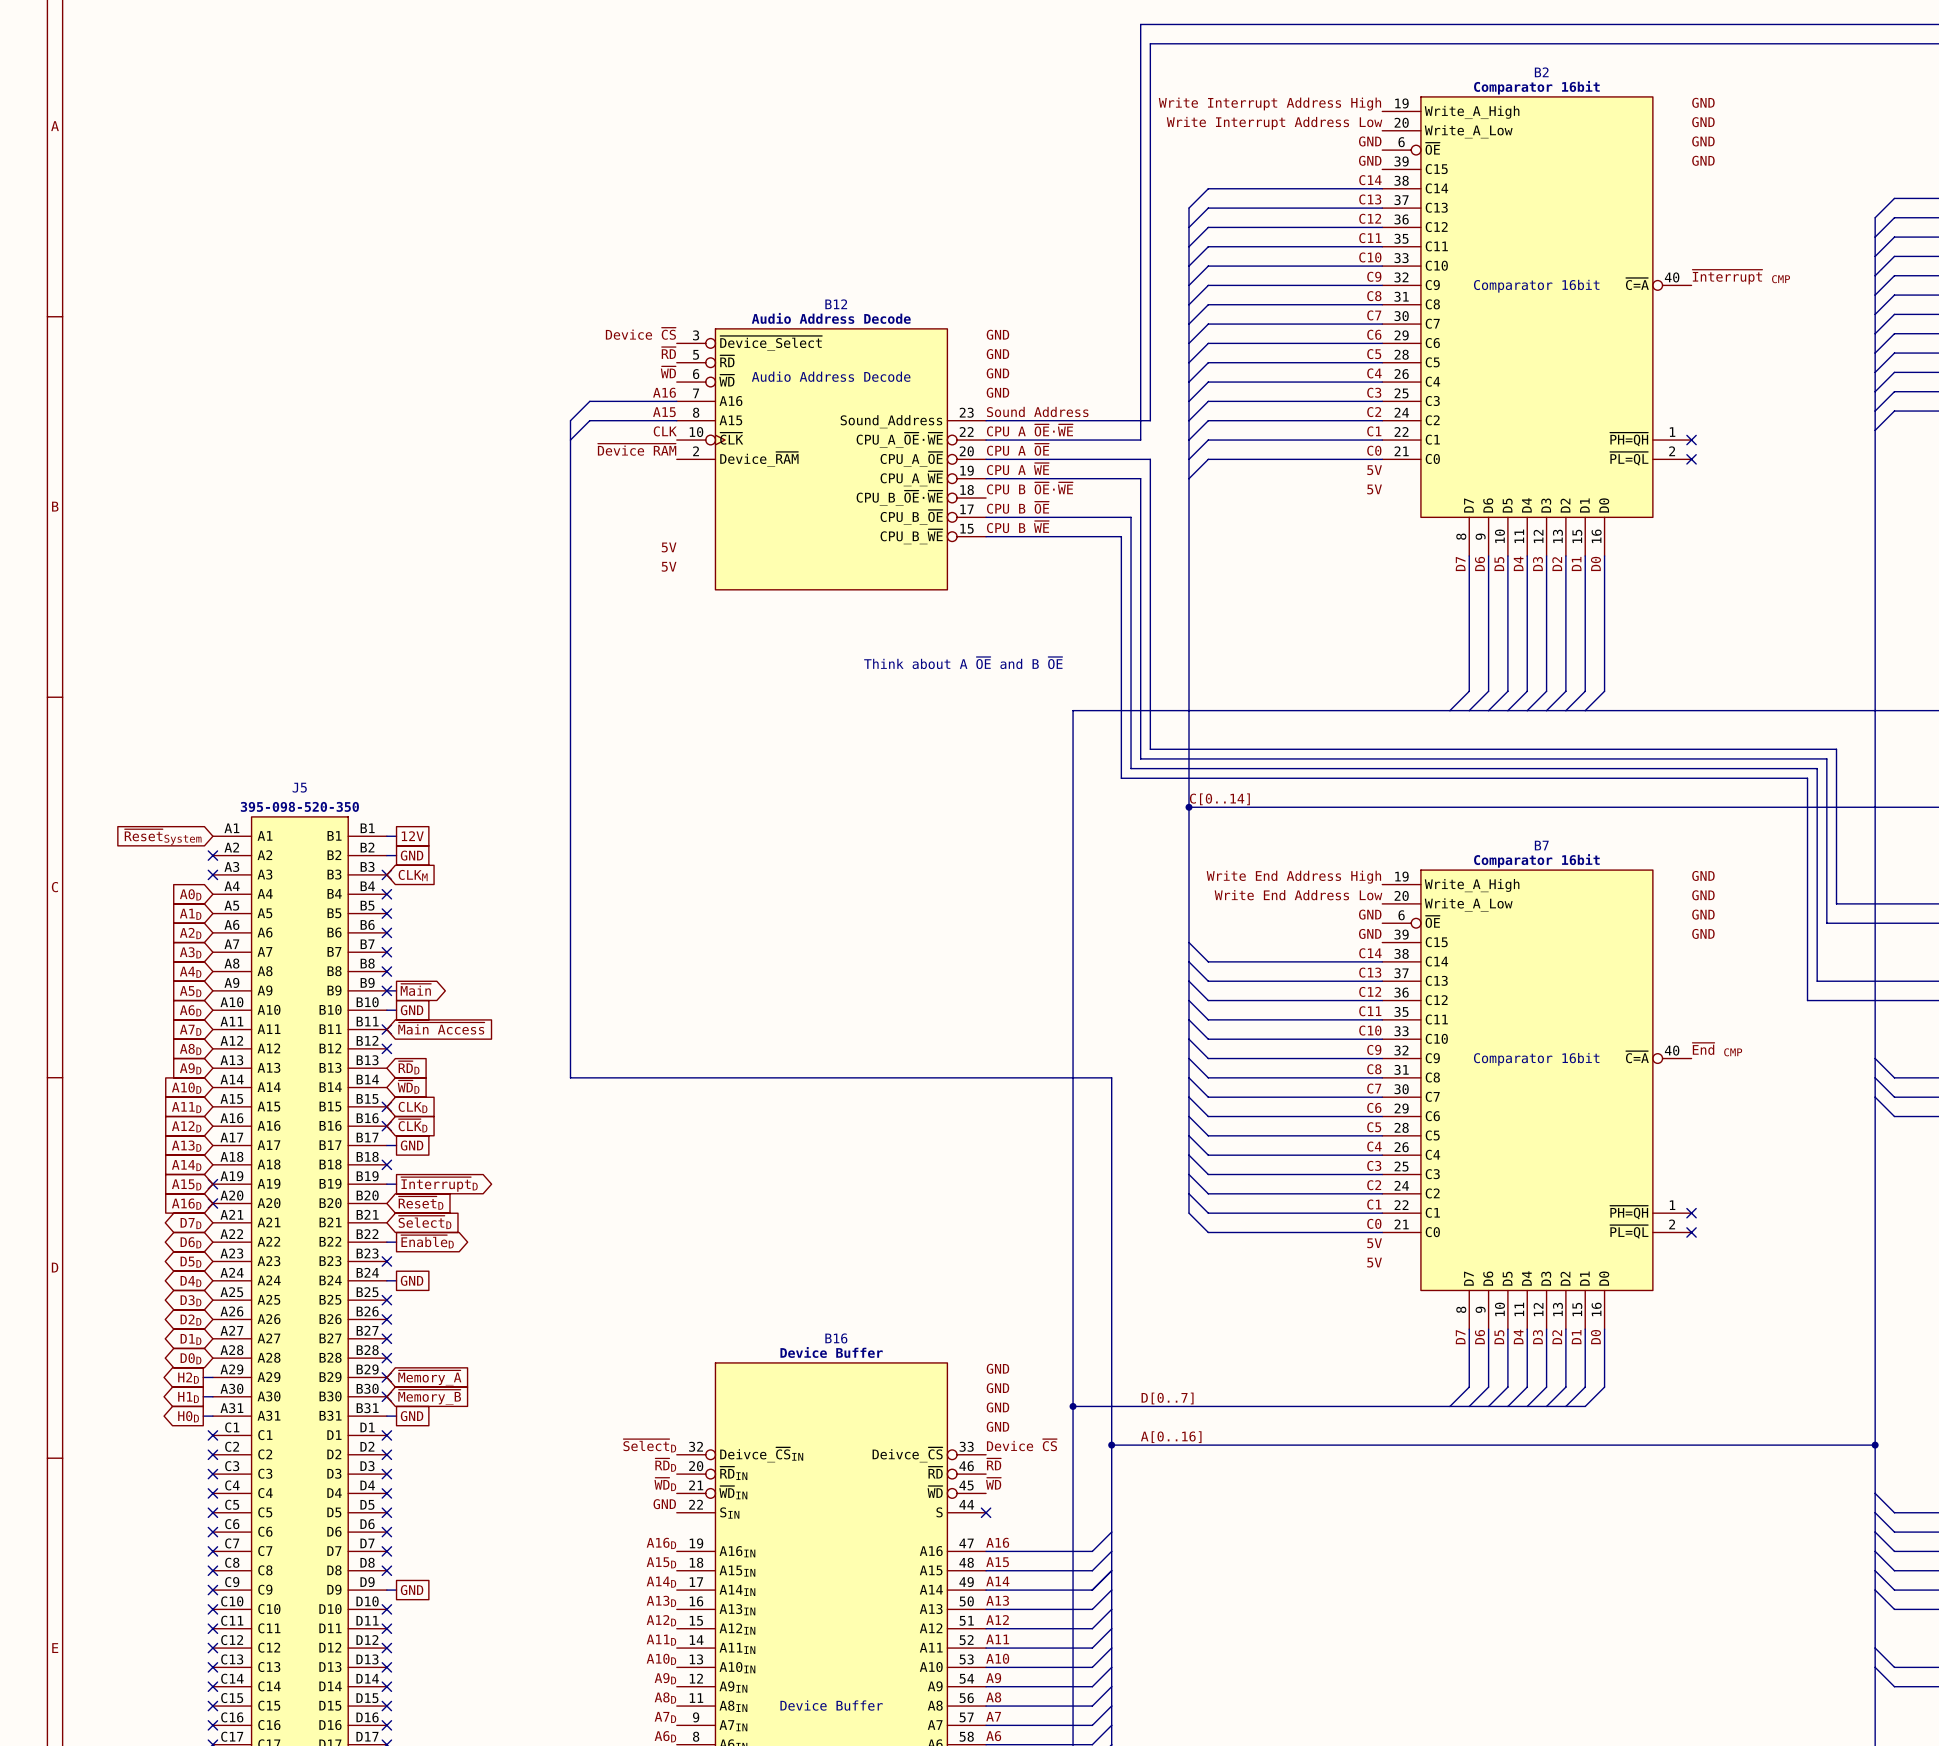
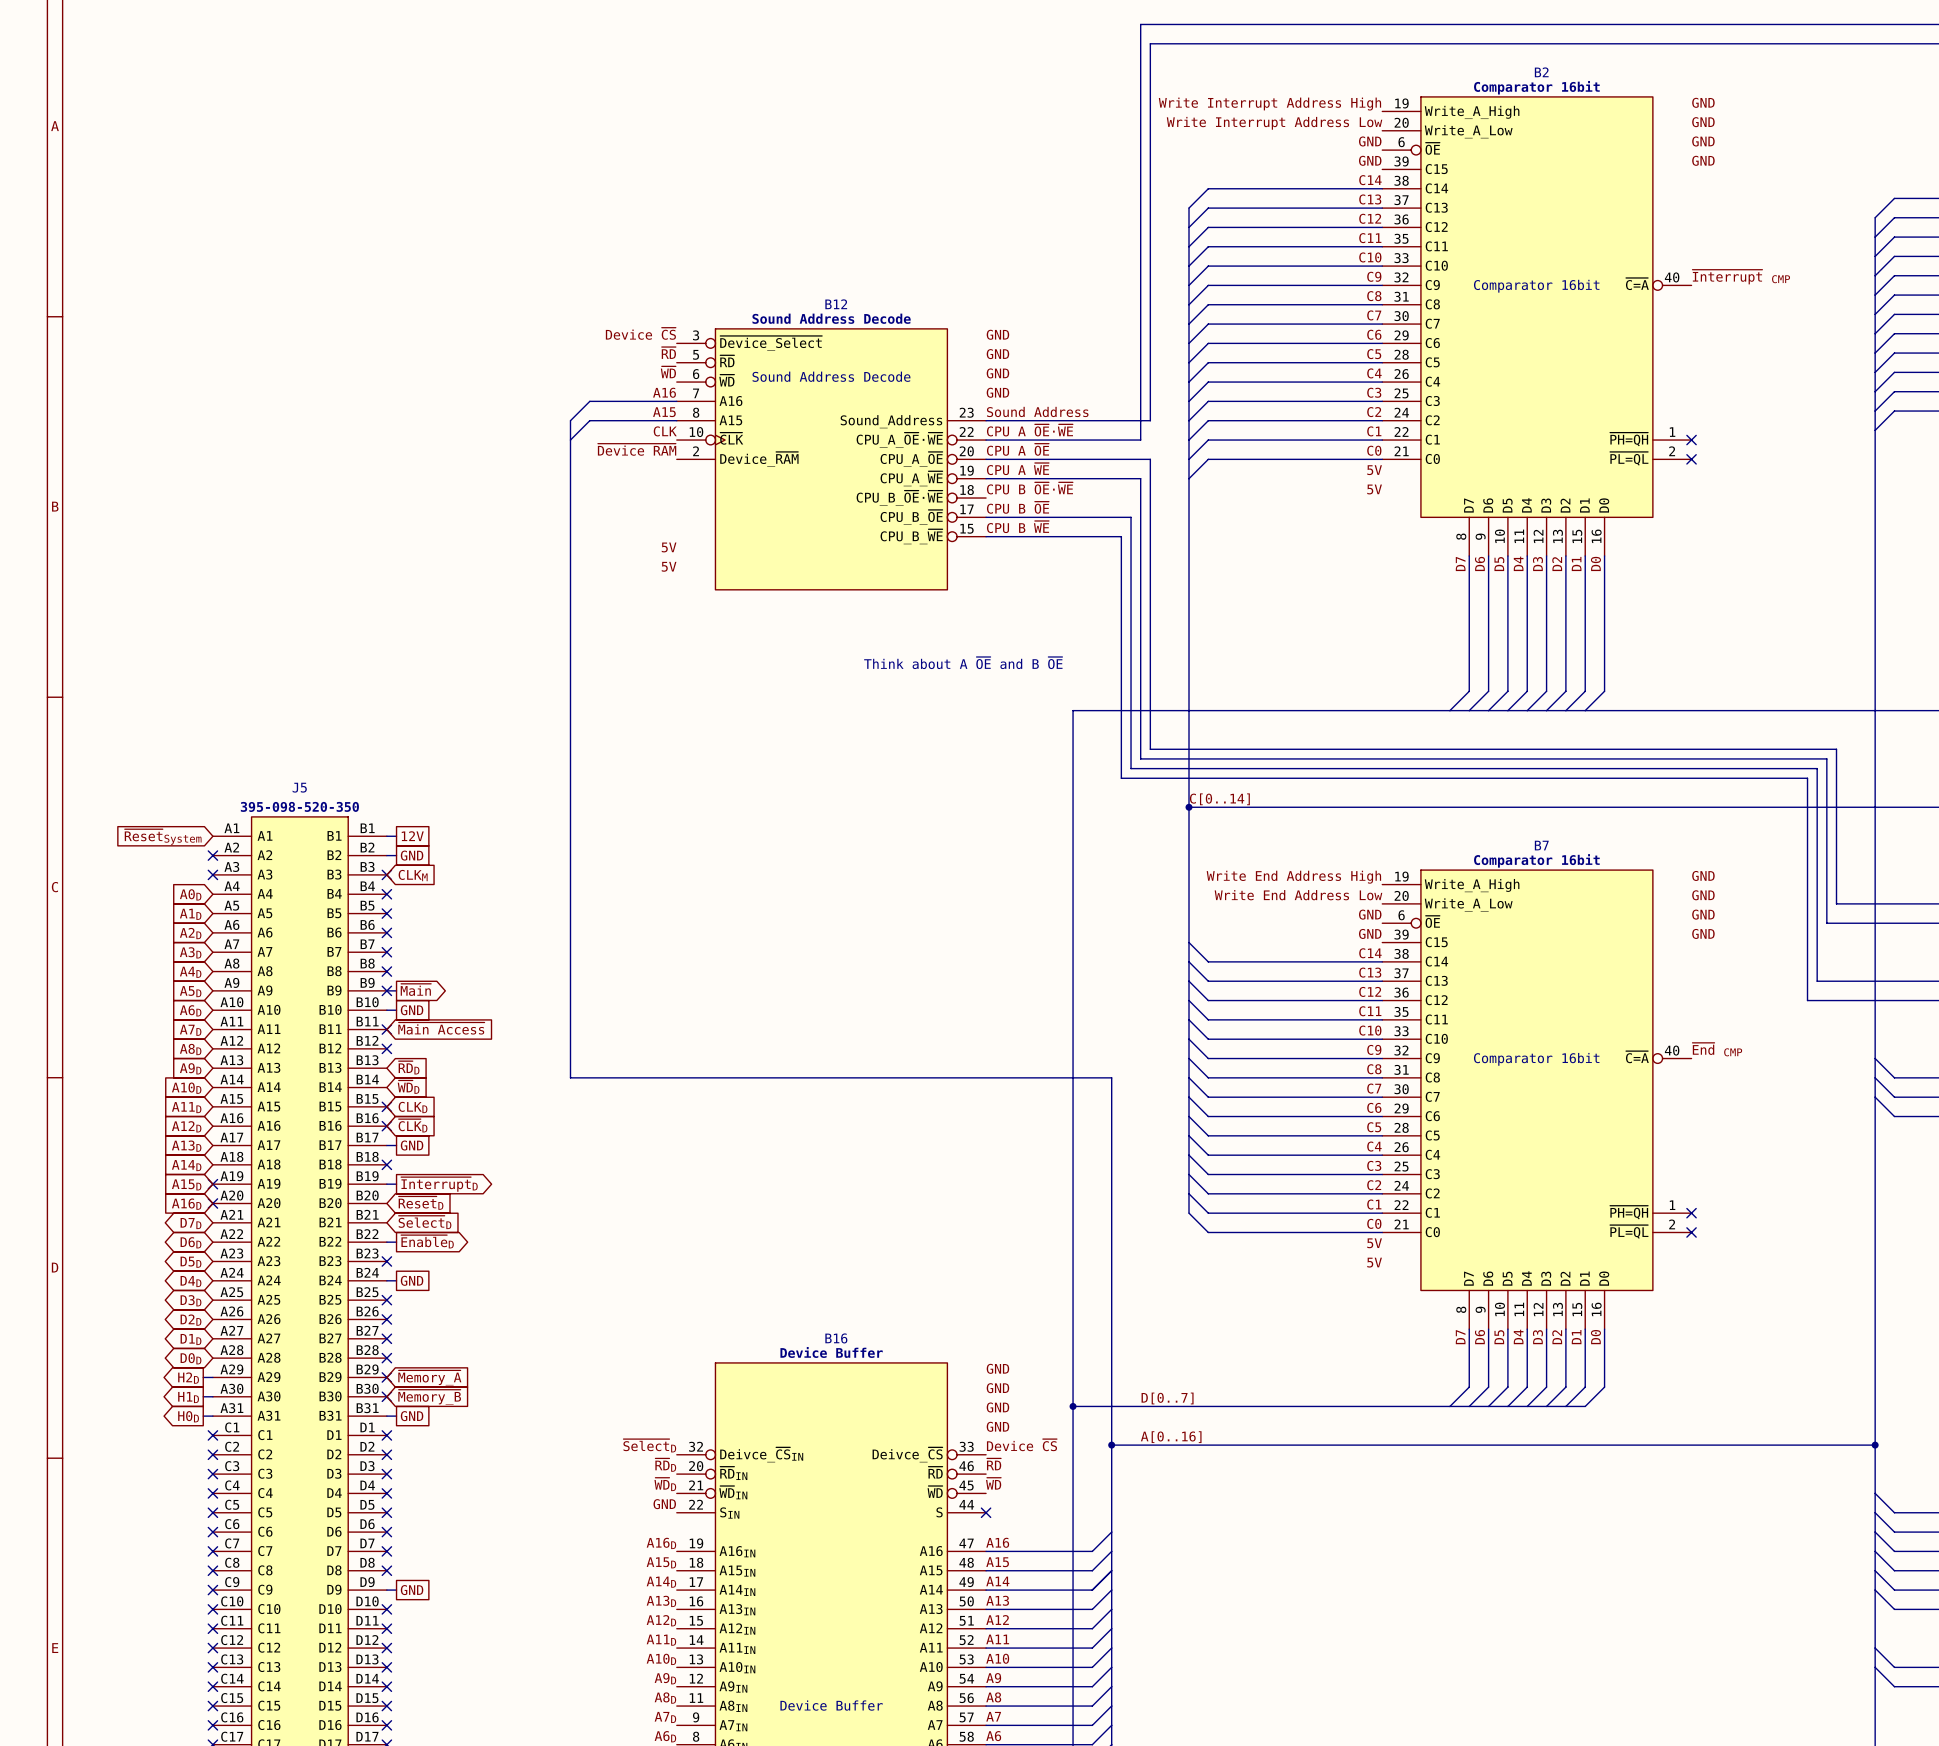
B12 value: Audio Address Decode (831, 318) -> Sound Address Decode (831, 318)
B12 text: Audio Address Decode (831, 376) -> Sound Address Decode (831, 376)

